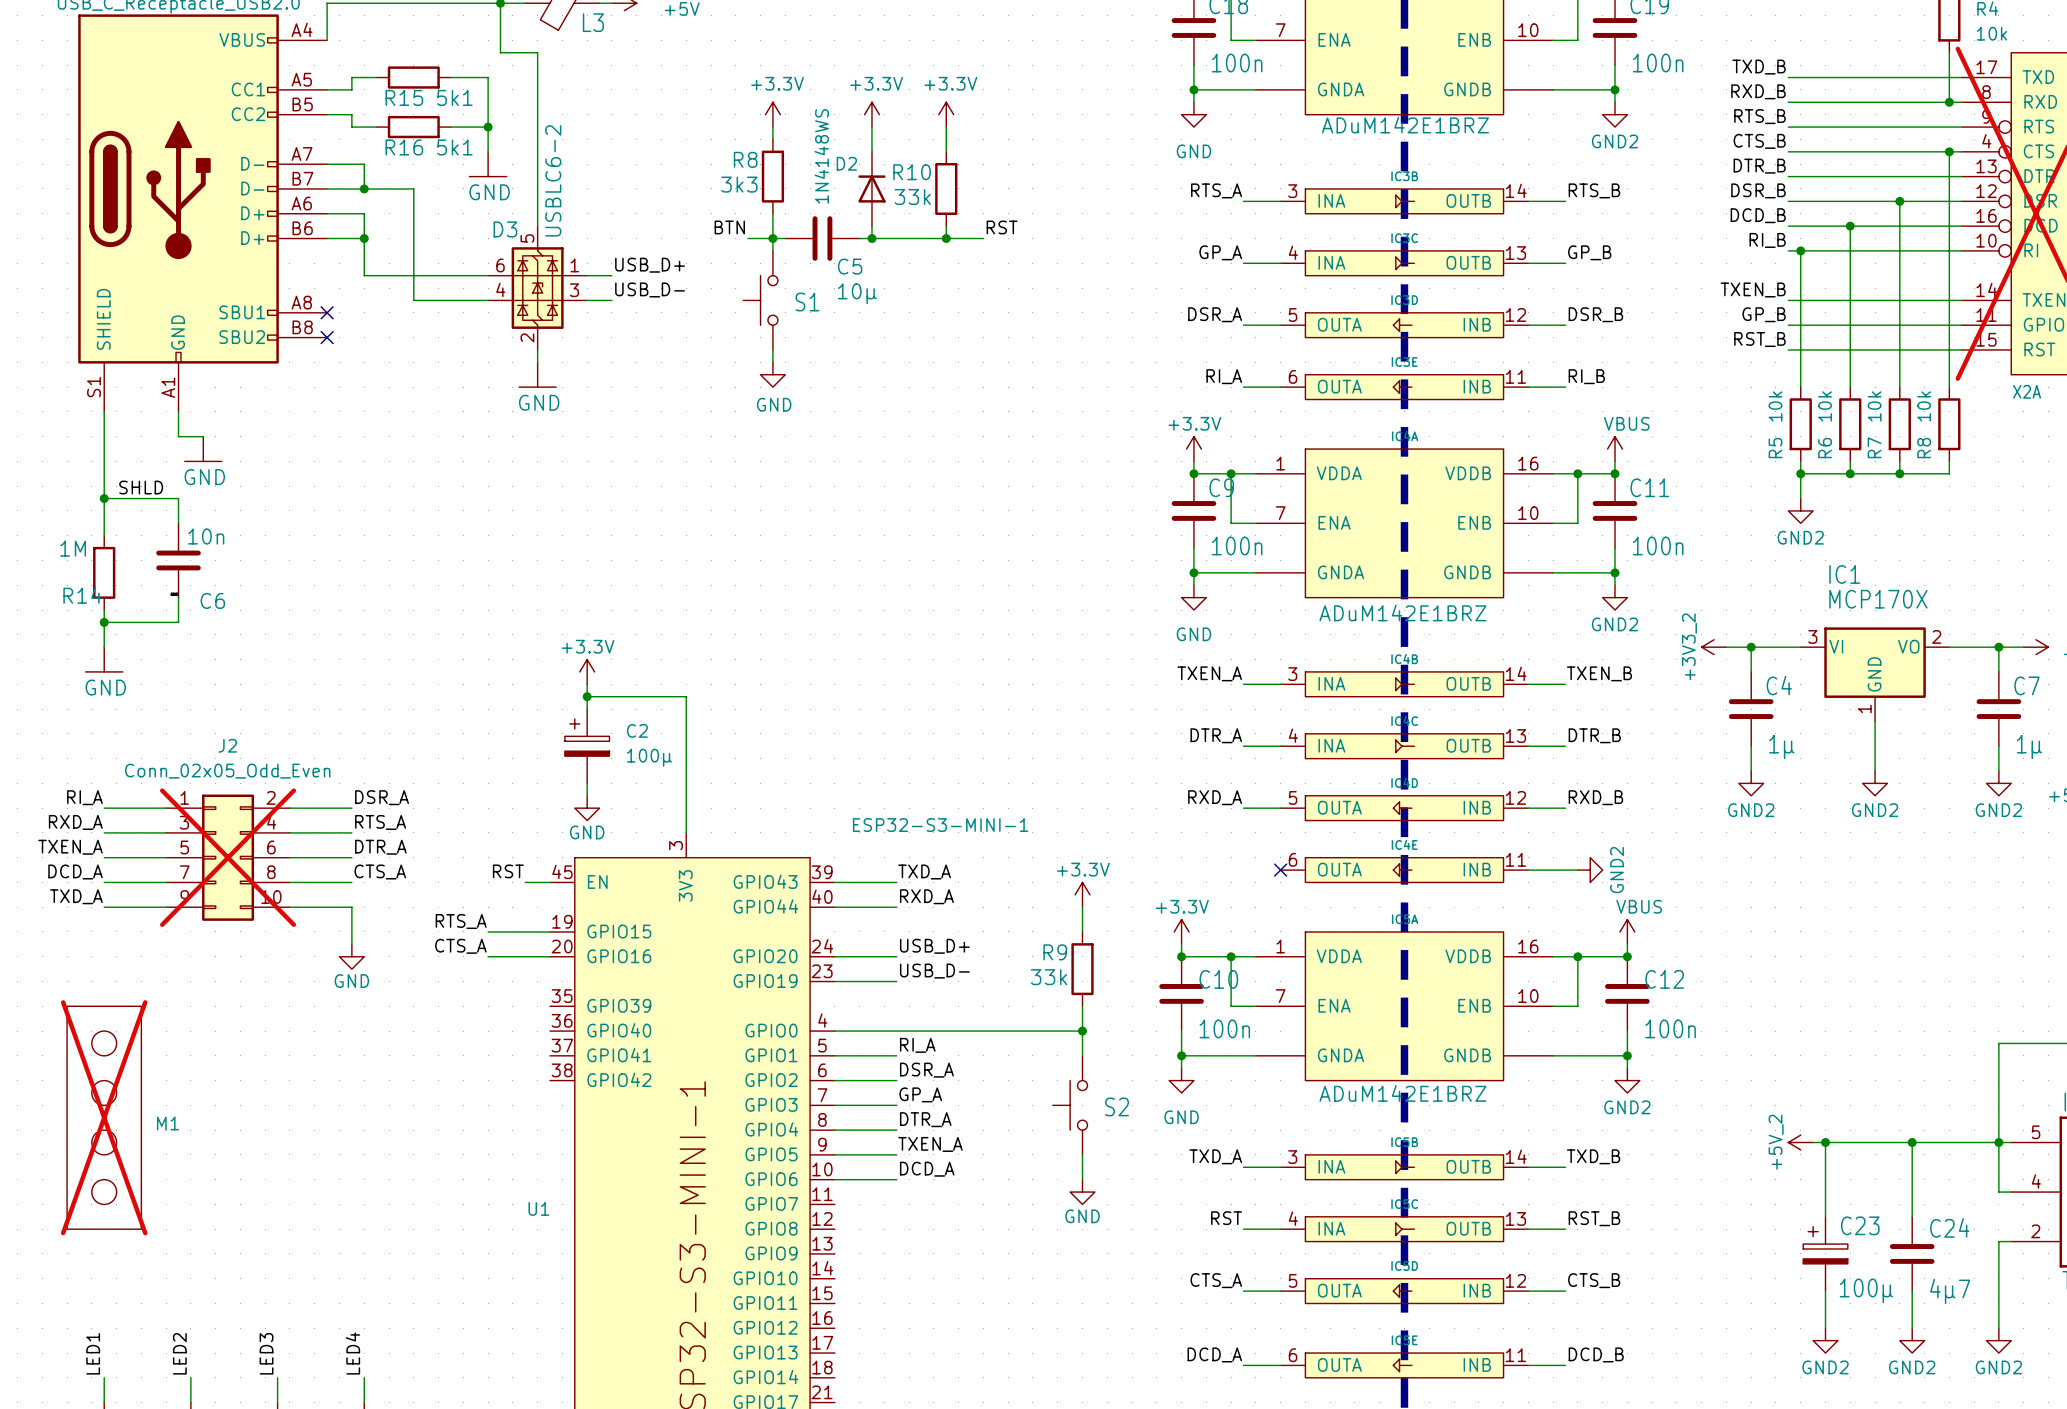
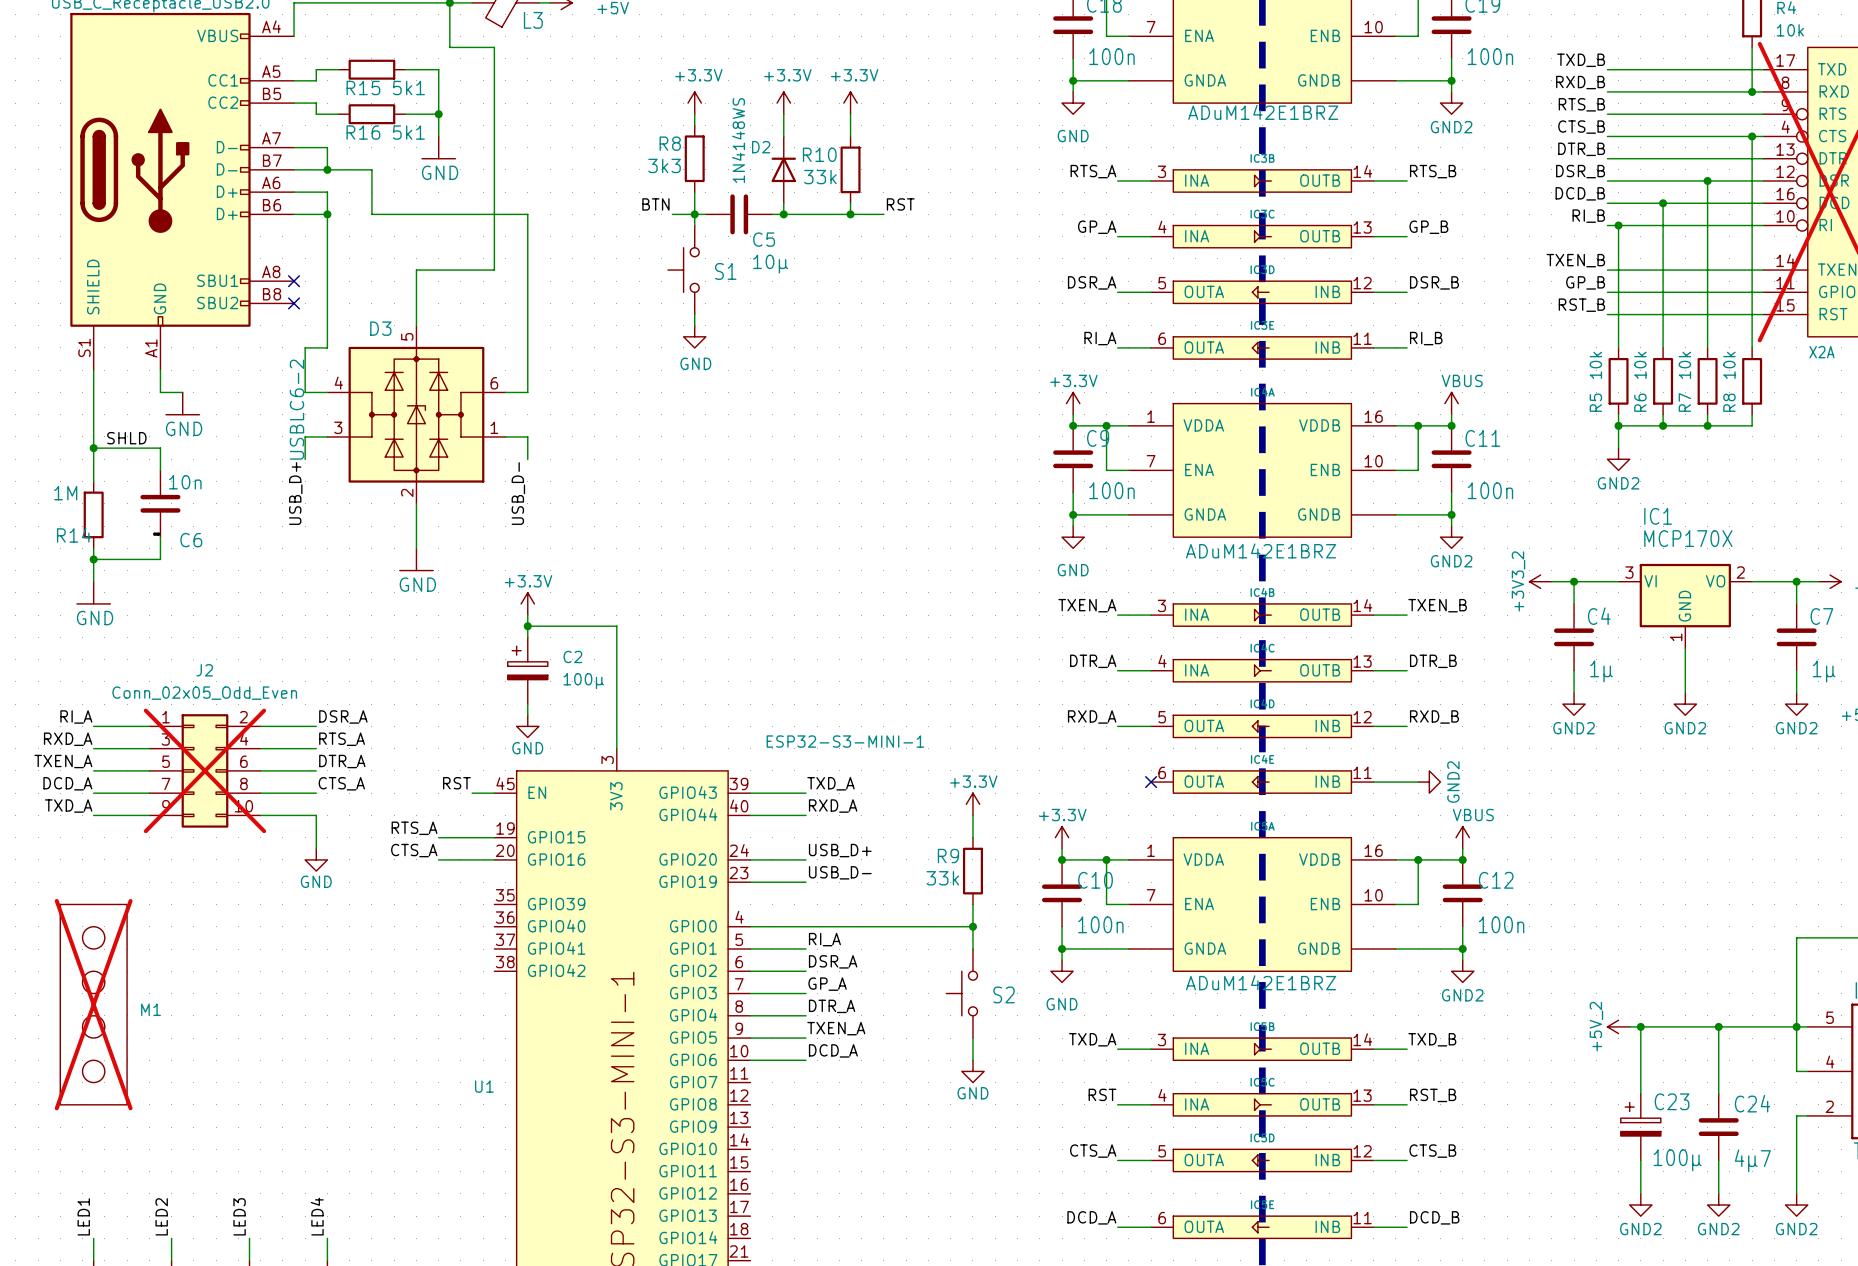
wire: (537, 52) (537, 226) -> (483, 47) (494, 47) (494, 270) (438, 270)
D3 value position: USBLC6-2 (553, 180) -> USBLC6-2 (296, 409)
D3 symbol: [488, 226, 588, 350] -> [327, 325, 506, 504]
D3 name position: D3 (505, 229) -> D3 (380, 328)
wire: (413, 238) (413, 300) (463, 300) -> (416, 325) (416, 270)
wire: none -> (371, 214) (527, 214) (527, 392) (505, 392)
label: USB_D+ (650, 265) -> none
wire: (364, 275) (488, 275) -> (327, 247) (327, 347) (305, 347) (305, 392) (327, 392)
wire: (587, 275) (611, 275) -> none
label rotation: 0° (650, 289) -> 90° counterclockwise (518, 493)
label position: USB_D- (650, 289) -> USB_D- (518, 493)
wire: (587, 300) (611, 300) -> none
wire: (537, 349) (537, 362) -> none
power symbol: GND (537, 374) -> none
wire: none -> (327, 436) (305, 436) (305, 459)
wire: none -> (505, 436) (527, 436) (527, 459)
label: none -> USB_D+ (295, 493)
wire: none -> (416, 503) (416, 548)
power symbol: none -> GND (416, 559)

